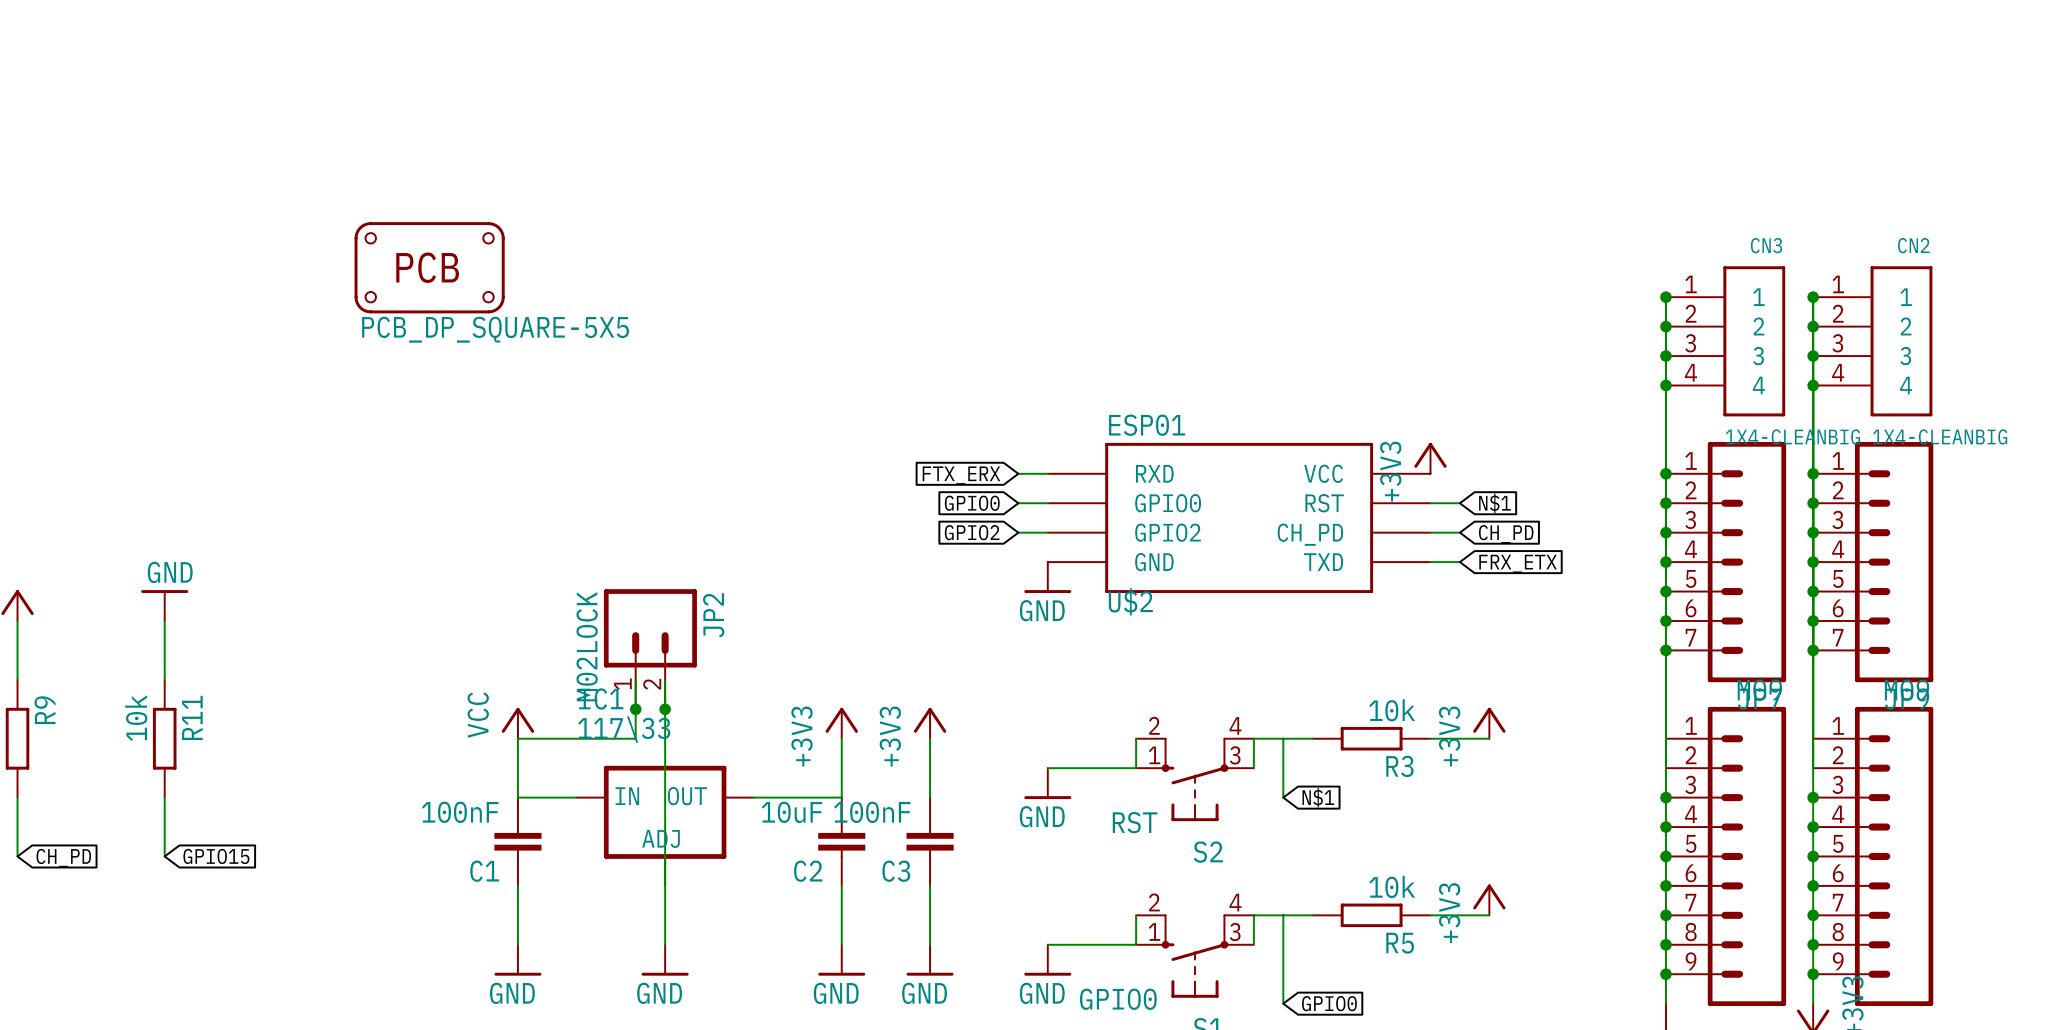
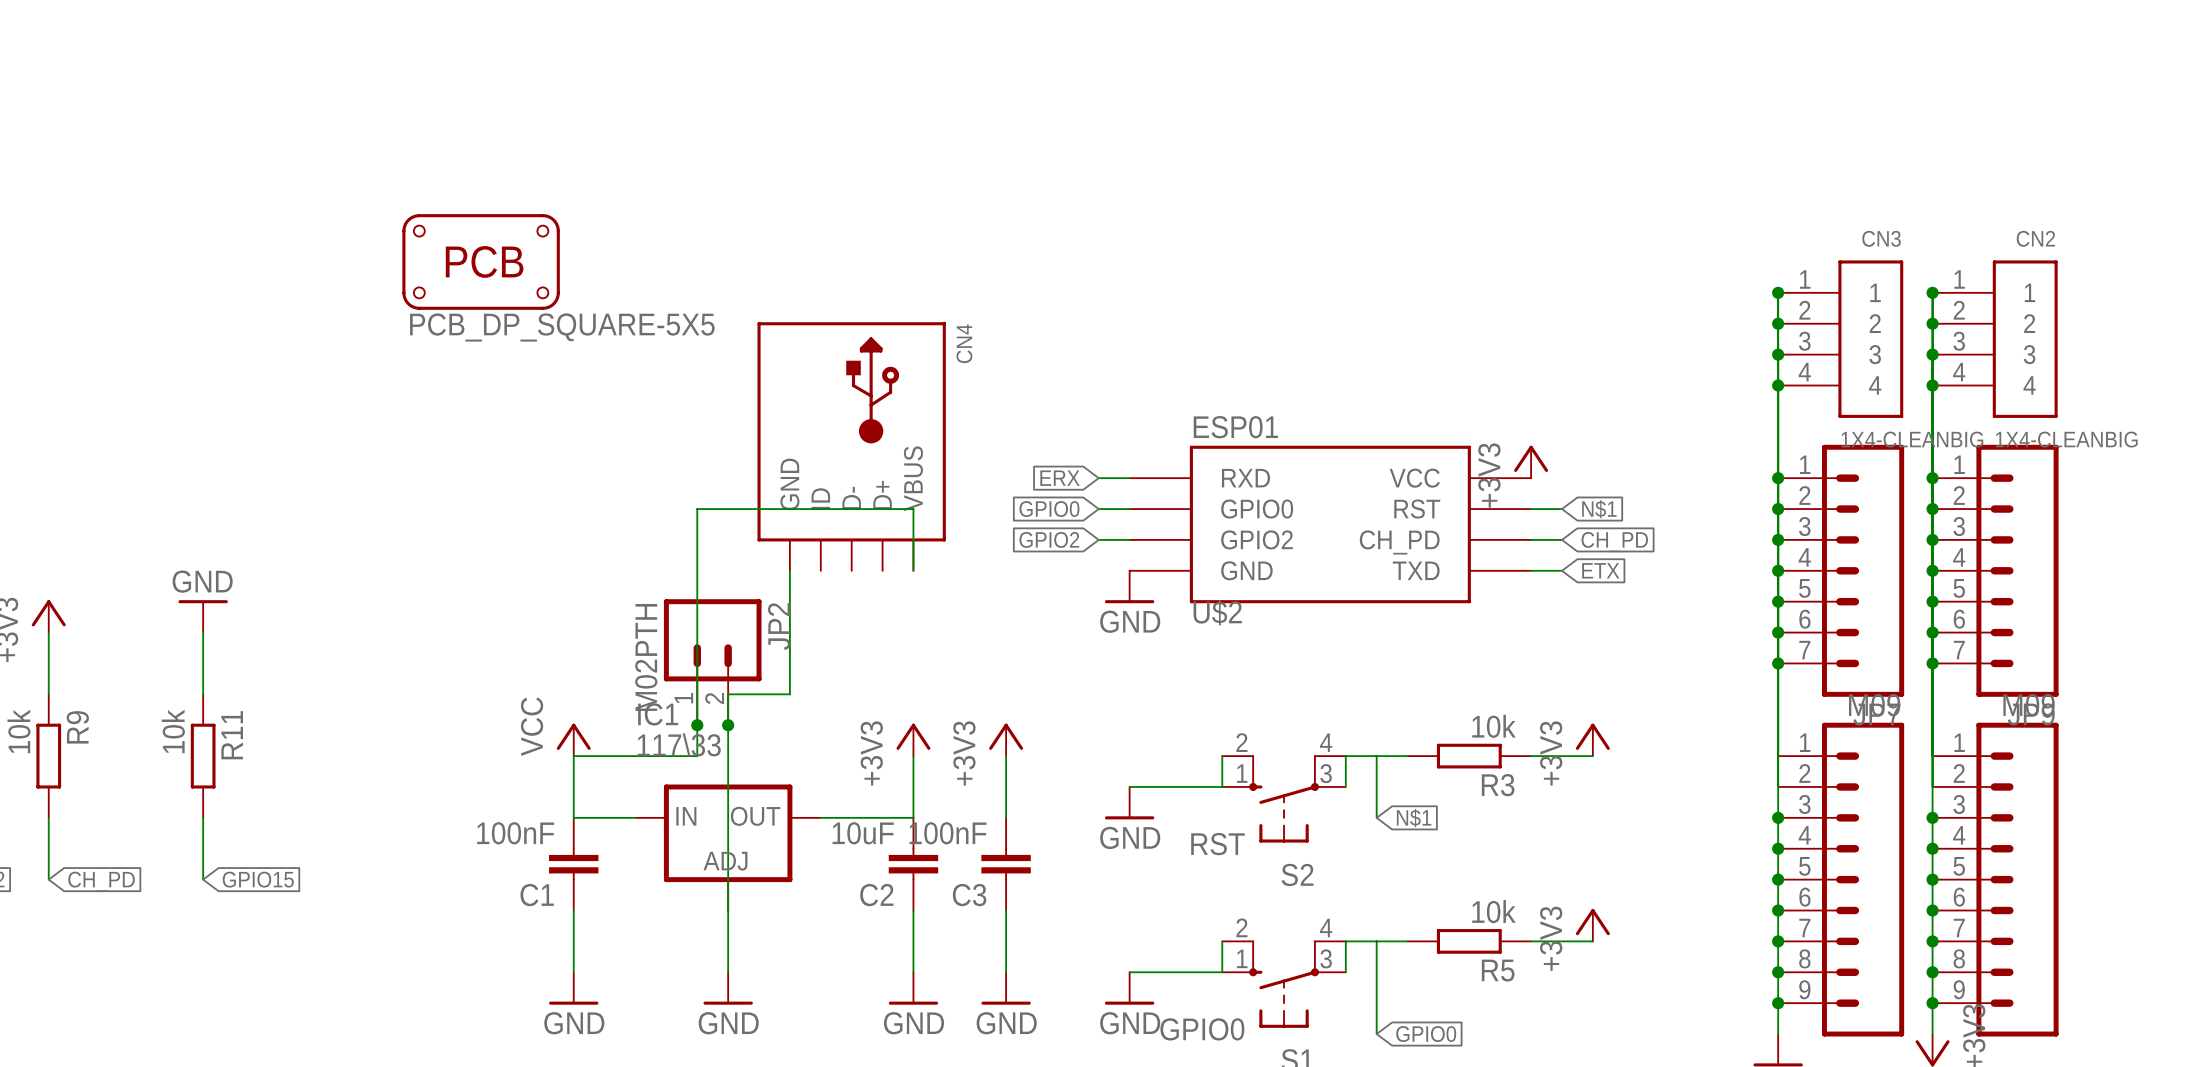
CN4: none -> (851, 446)
global label: FTX_ERX (961, 475) -> ERX (1060, 478)
wire: none -> (789, 570) (789, 694) (728, 694)
wire: none -> (913, 570) (913, 509) (697, 509) (697, 694)
global label: FRX_ETX (1518, 563) -> ETX (1600, 570)
JP2 value: M02LOCK (587, 646) -> M02PTH (646, 657)

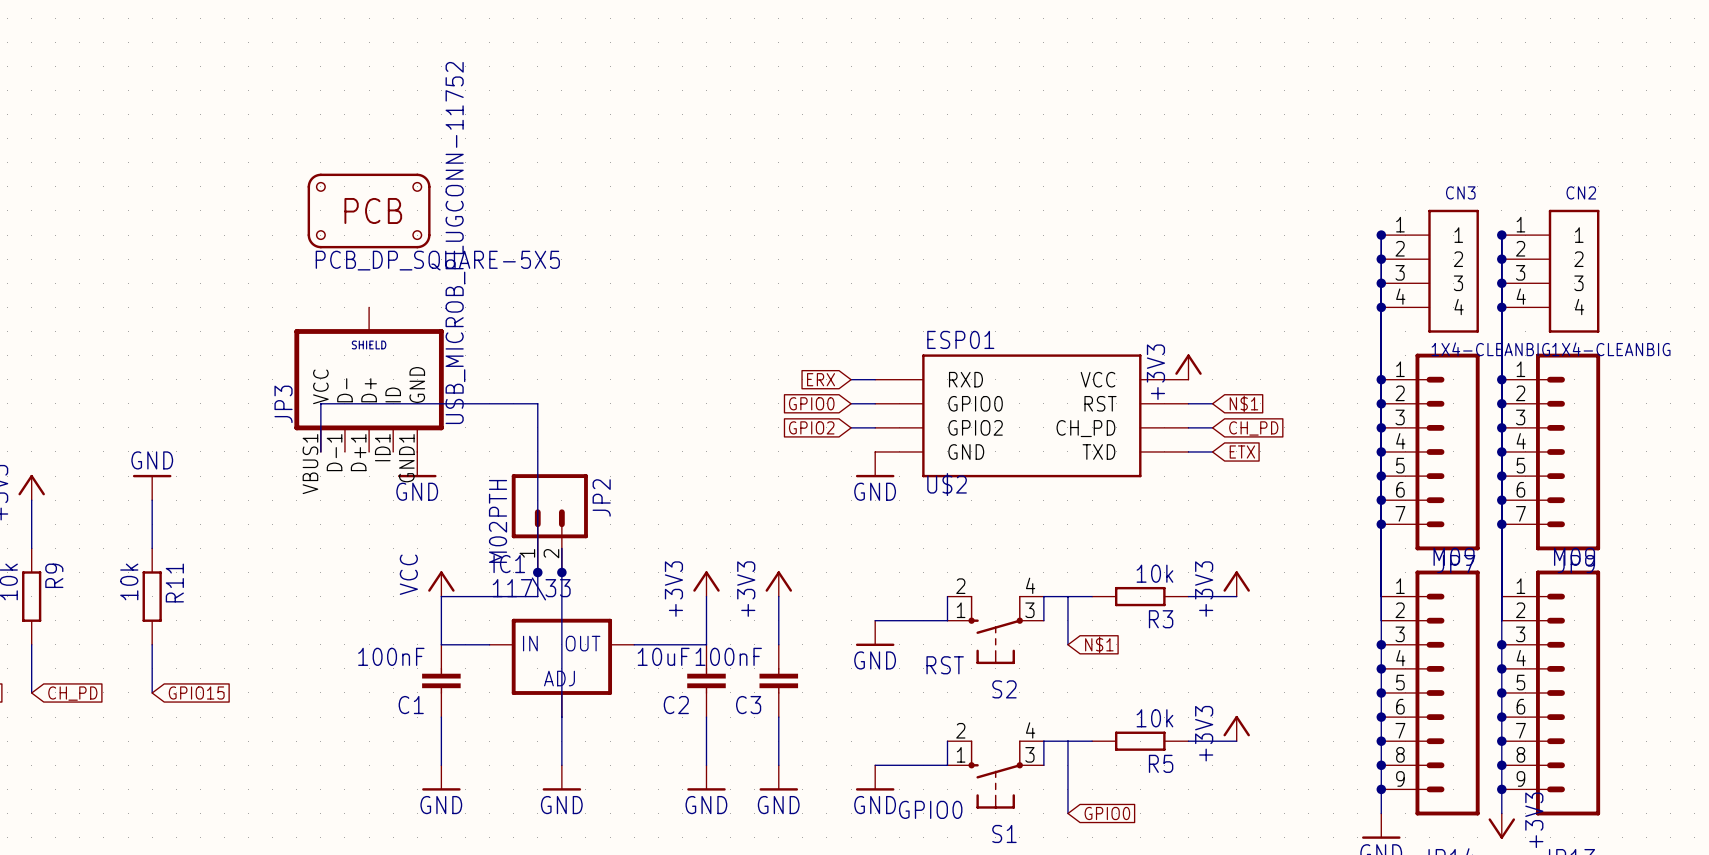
CN4: (851, 446) -> none
JP3: none -> USB_MICROB_PLUGCONN-11752 (369, 379)
wire: (697, 509) (913, 509) (913, 570) -> (537, 403) (320, 403) (320, 451)
wire: (789, 570) (789, 694) (728, 694) -> none
power symbol: none -> GND (417, 464)

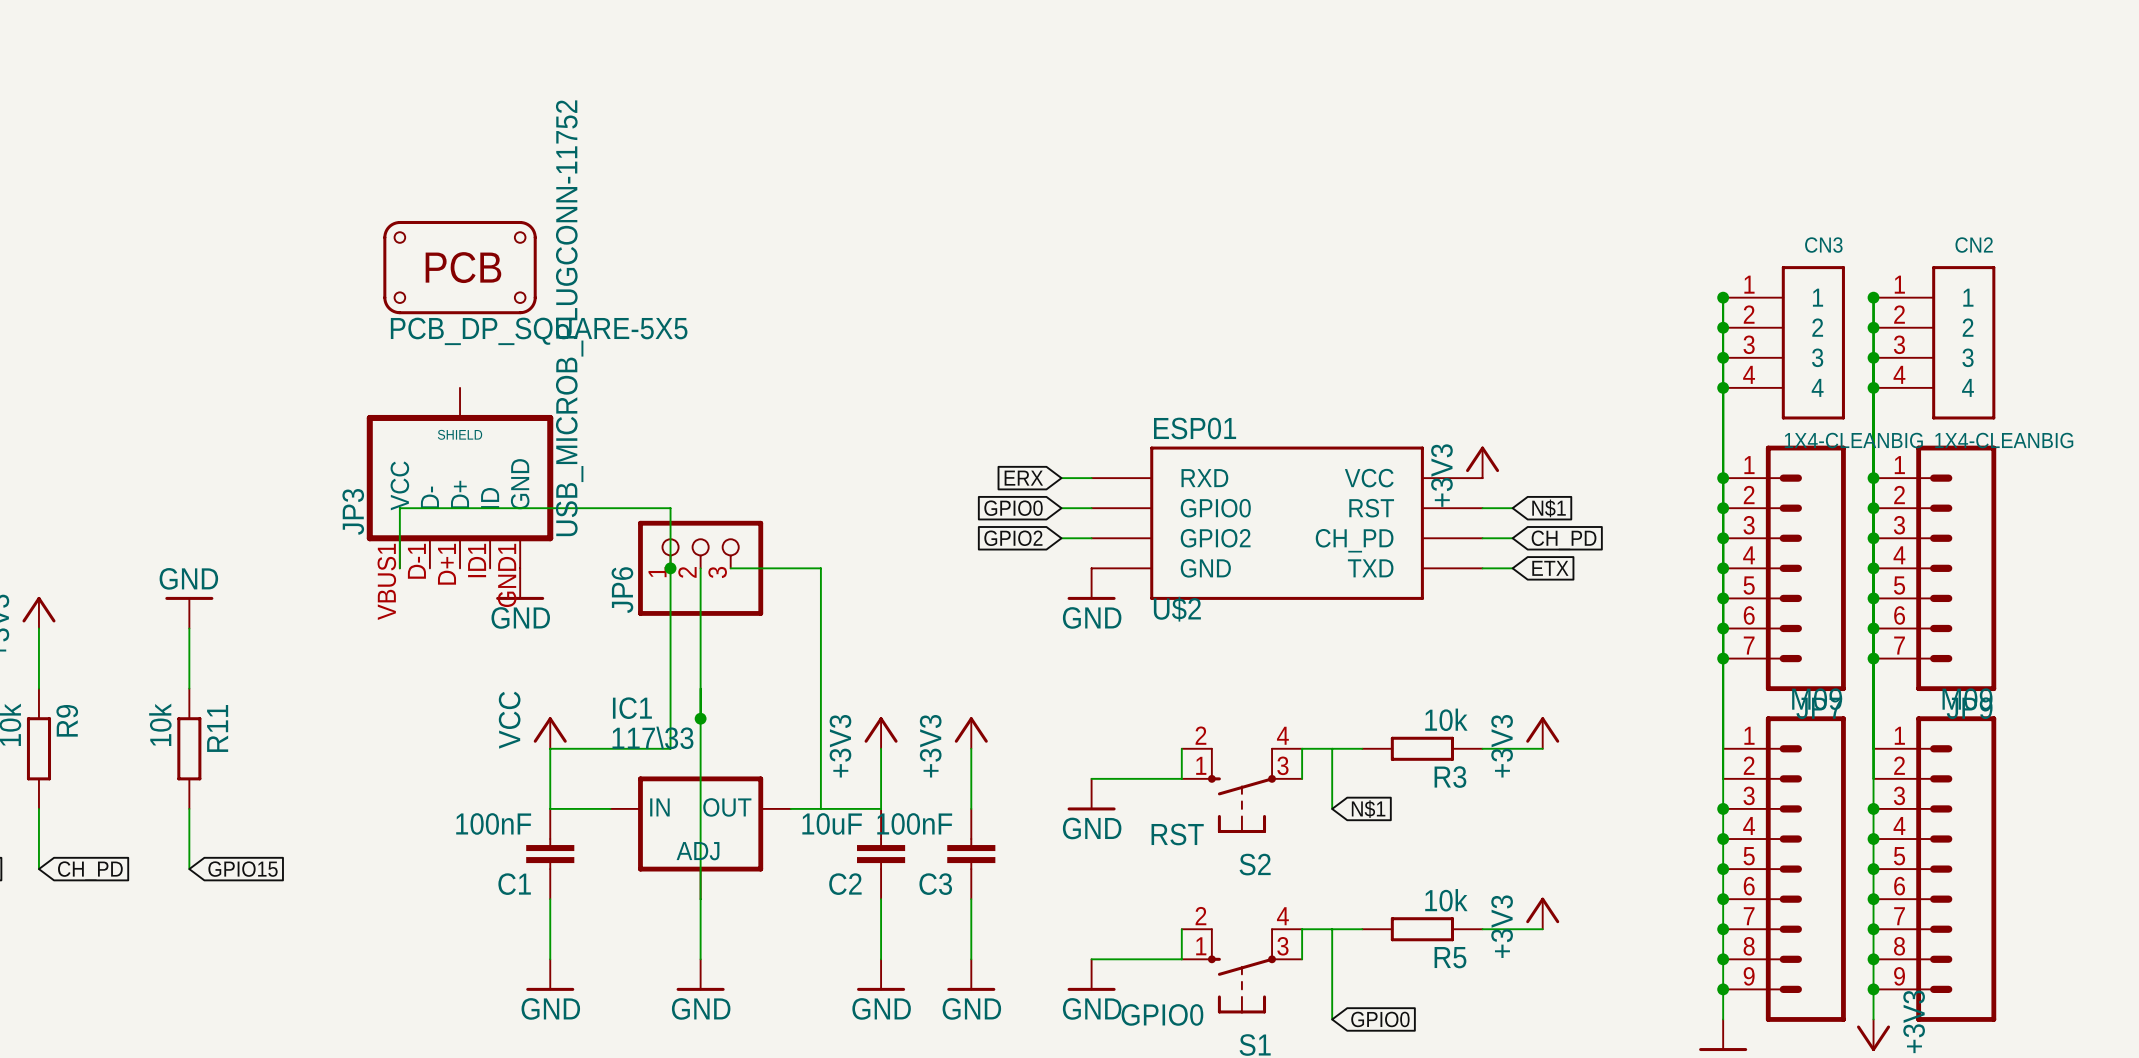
junction: none -> (670, 568)
wire: none -> (700, 568) (700, 688)
JP6: none -> (700, 568)
wire: none -> (730, 568) (820, 568) (820, 808)
JP2: M02PTH (549, 523) -> none
junction: (537, 572) -> none

